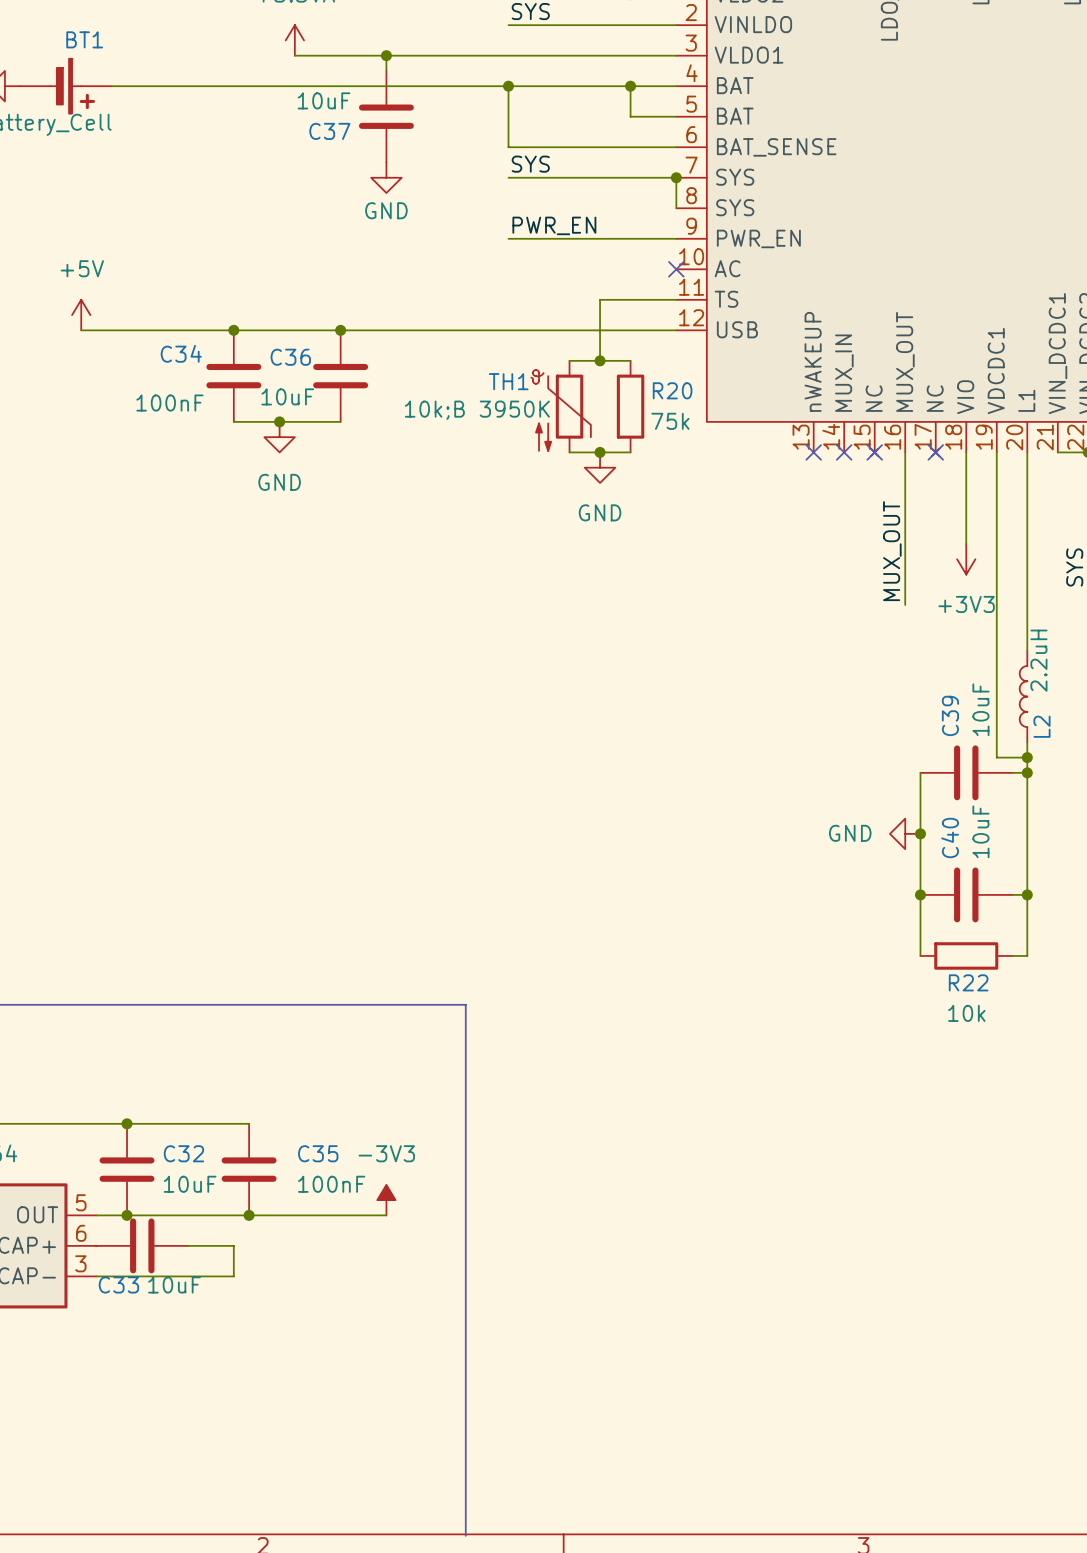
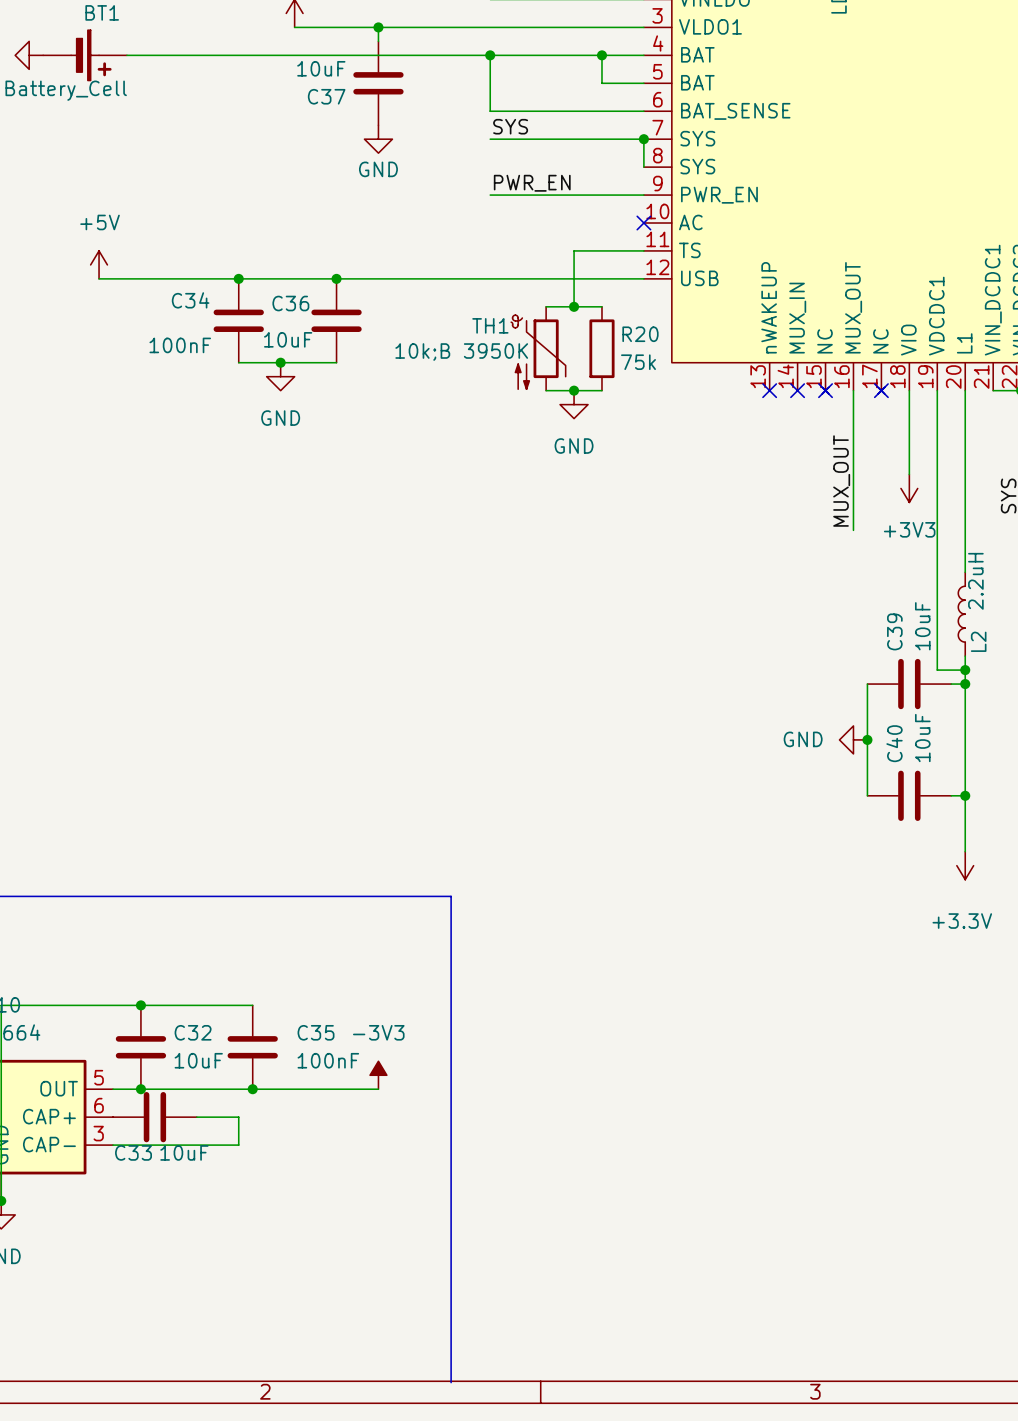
wire: (920, 894) (920, 955) -> none
junction: (920, 894) -> none
R22: 10k (966, 955) -> none
wire: (1012, 955) (1027, 955) -> none
power symbol: none -> +3.3V (965, 865)

